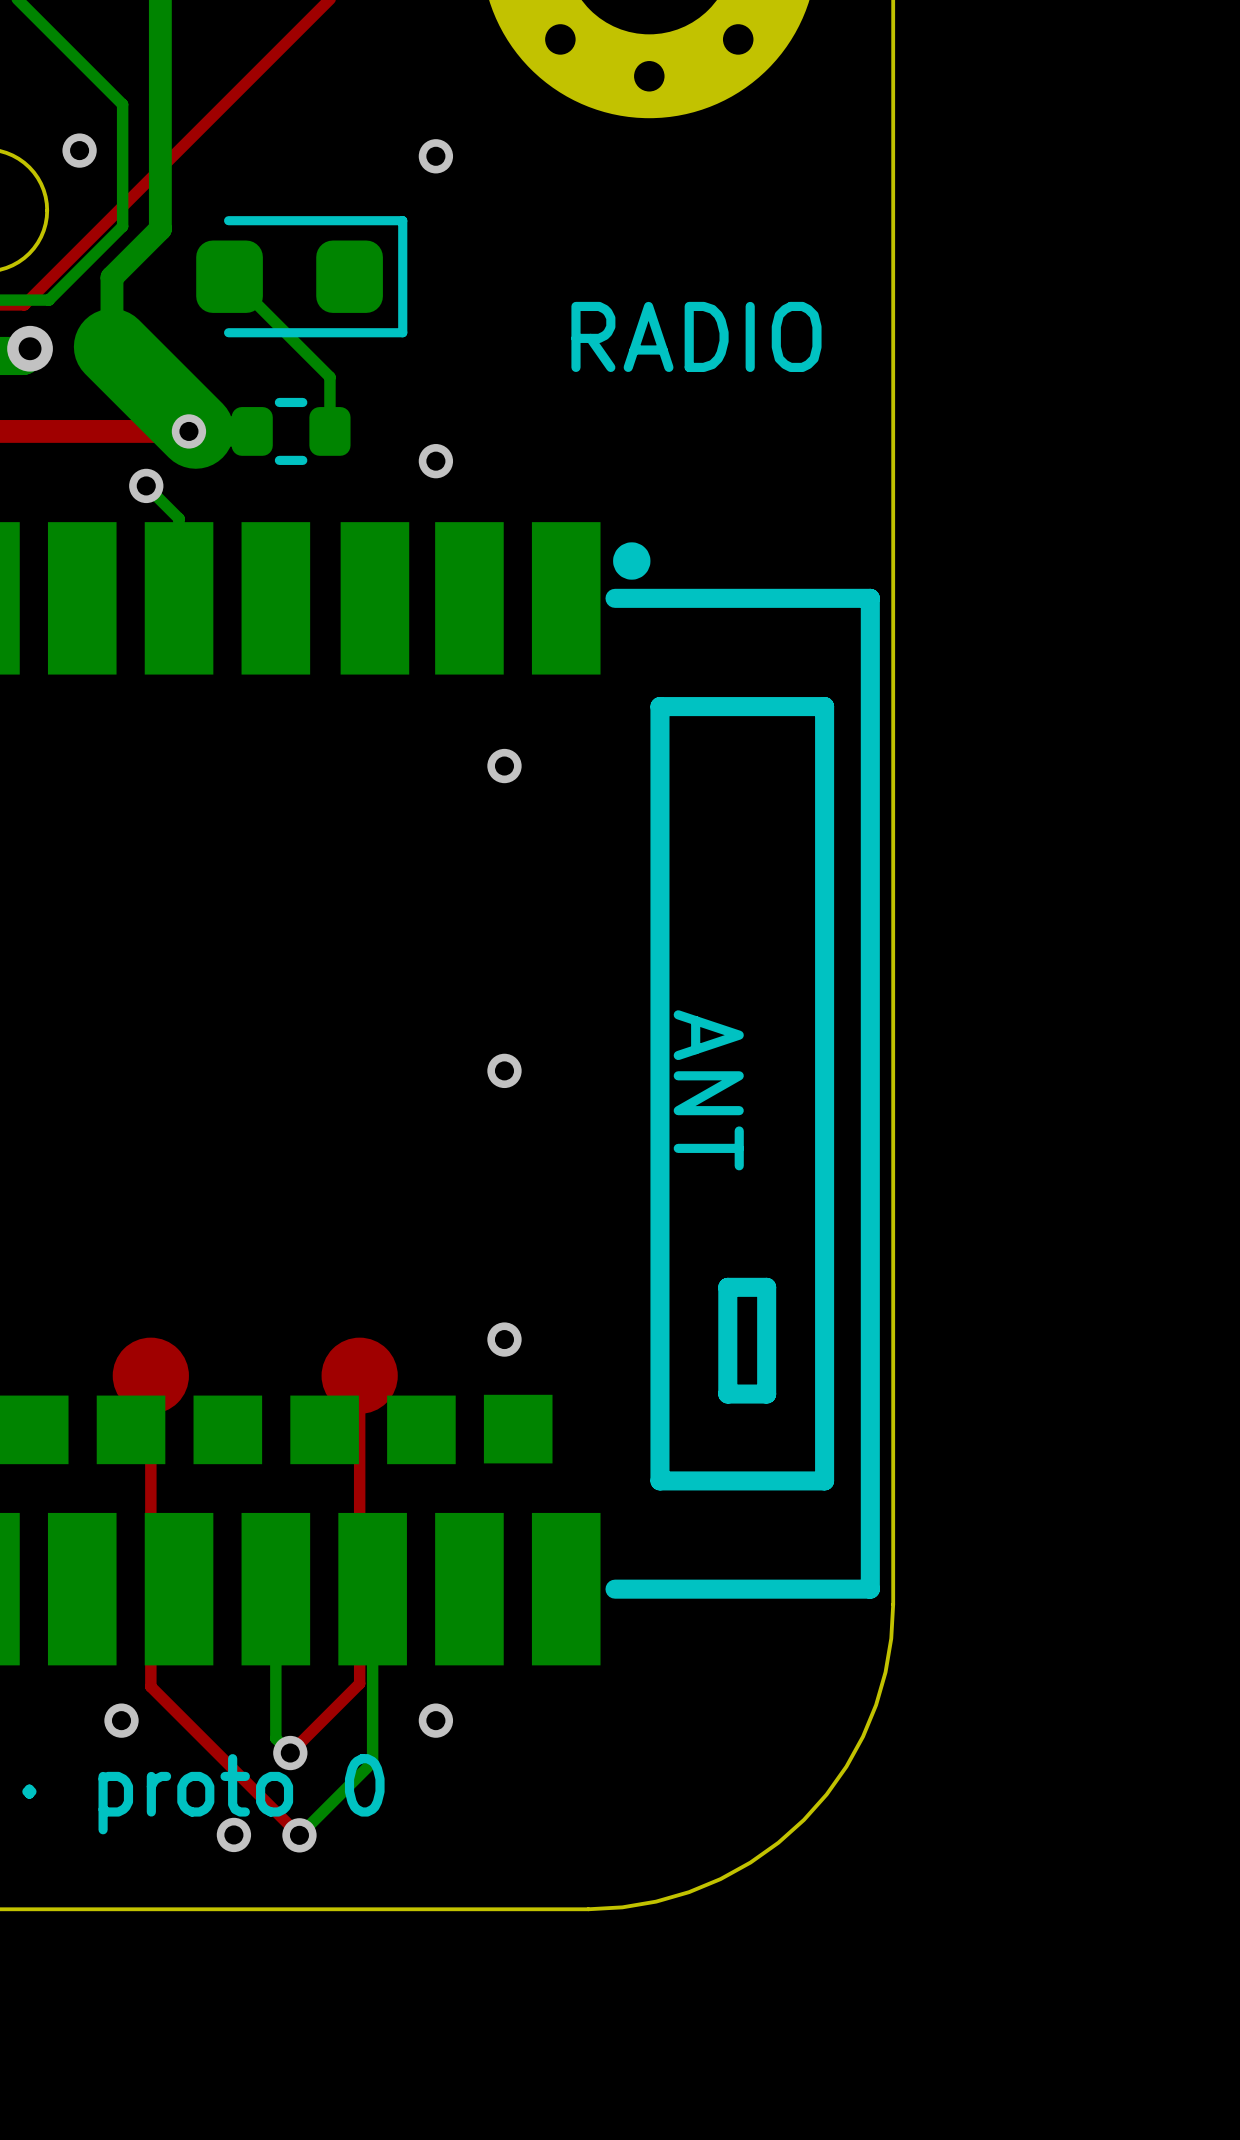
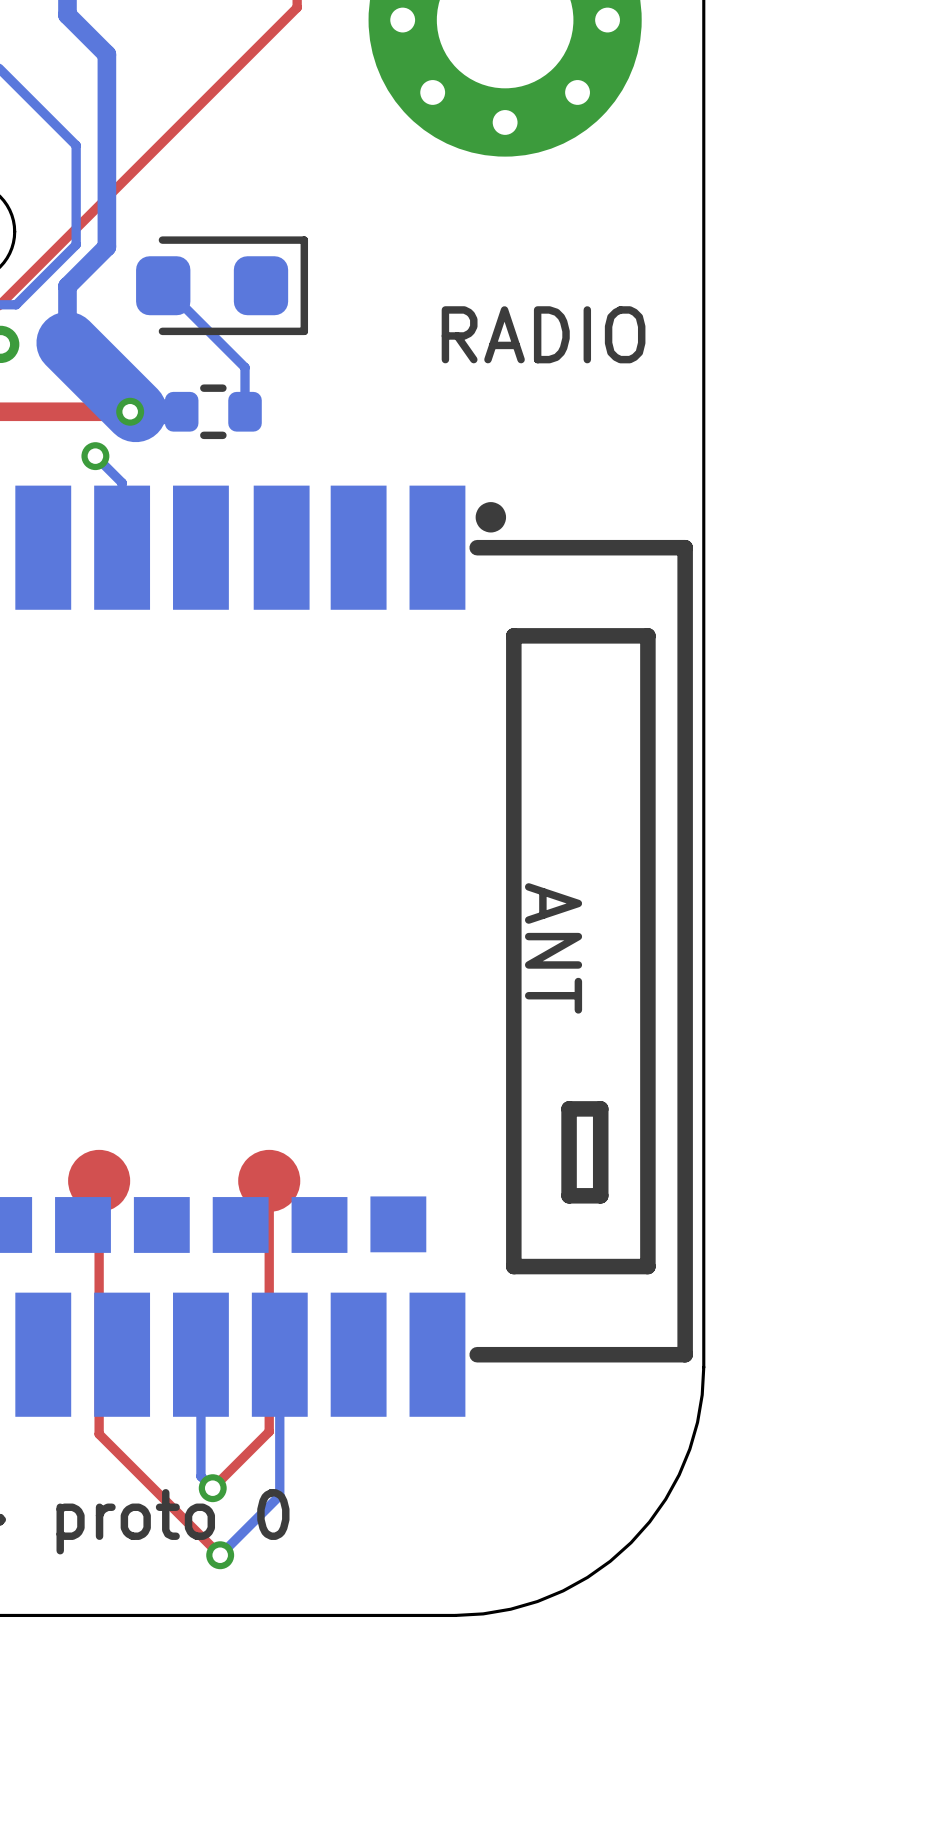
via: (79, 150) -> none
via: (435, 156) -> none
via: (435, 461) -> none
via: (504, 766) -> none
via: (504, 1070) -> none
via: (504, 1339) -> none
via: (121, 1720) -> none
via: (435, 1720) -> none
via: (233, 1834) -> none

